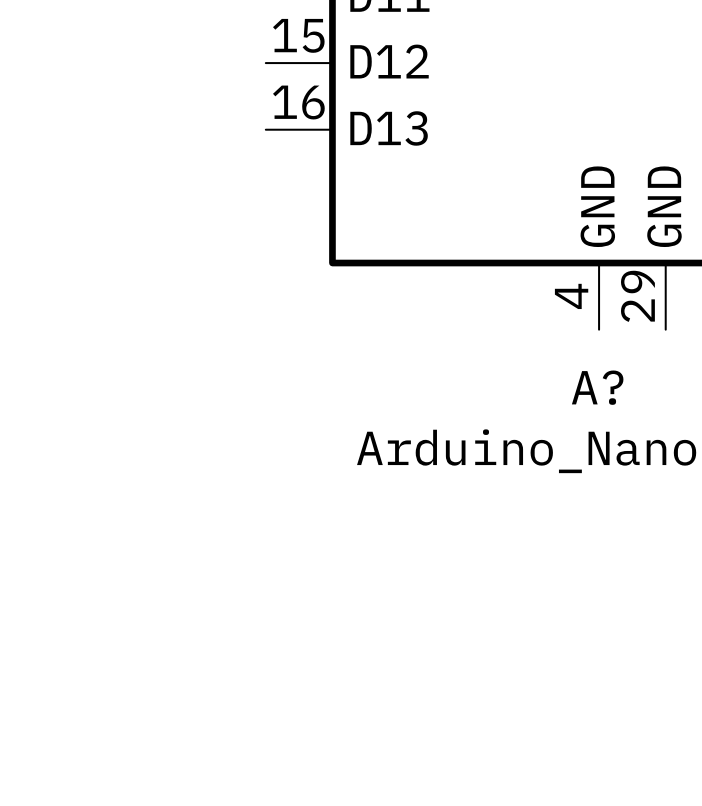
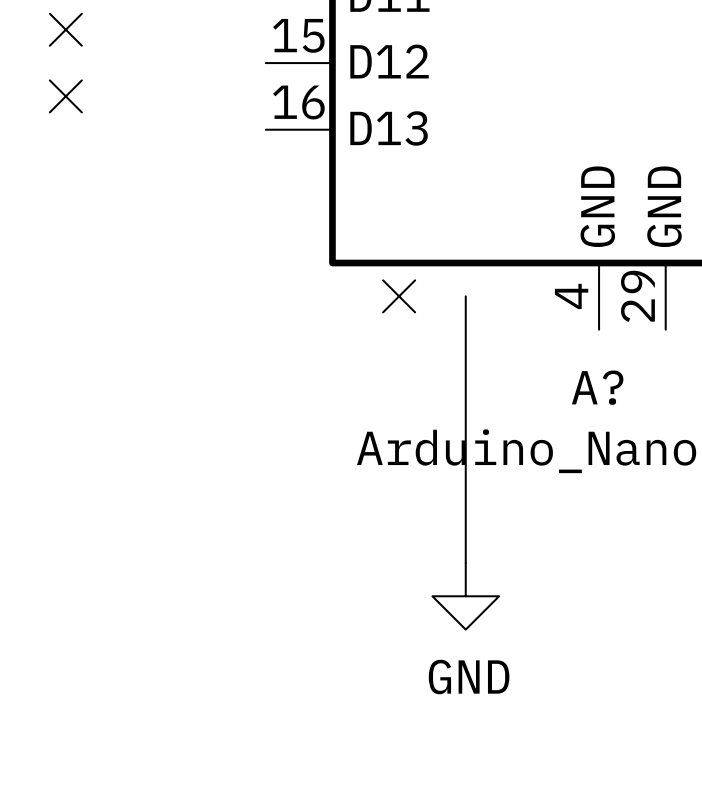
no-connect mark: none -> (65, 29)
no-connect mark: none -> (65, 96)
no-connect mark: none -> (399, 296)
wire: none -> (465, 296) (465, 562)
power symbol: none -> GND (465, 596)

